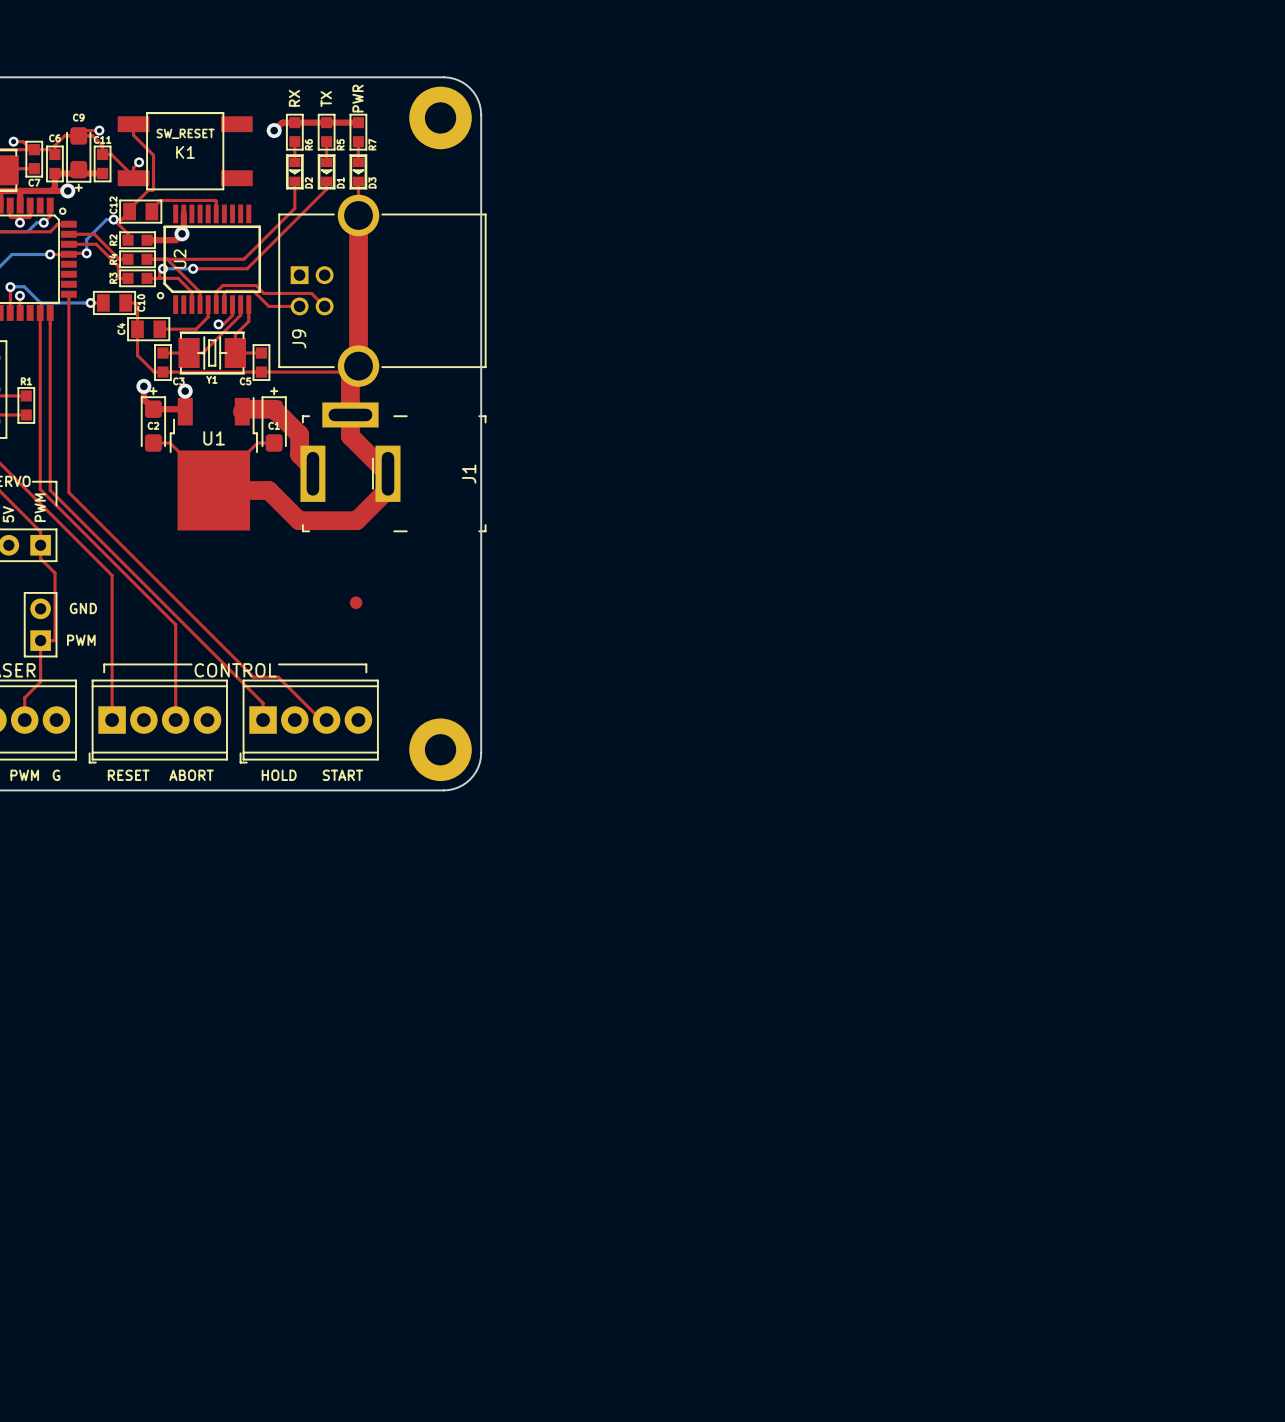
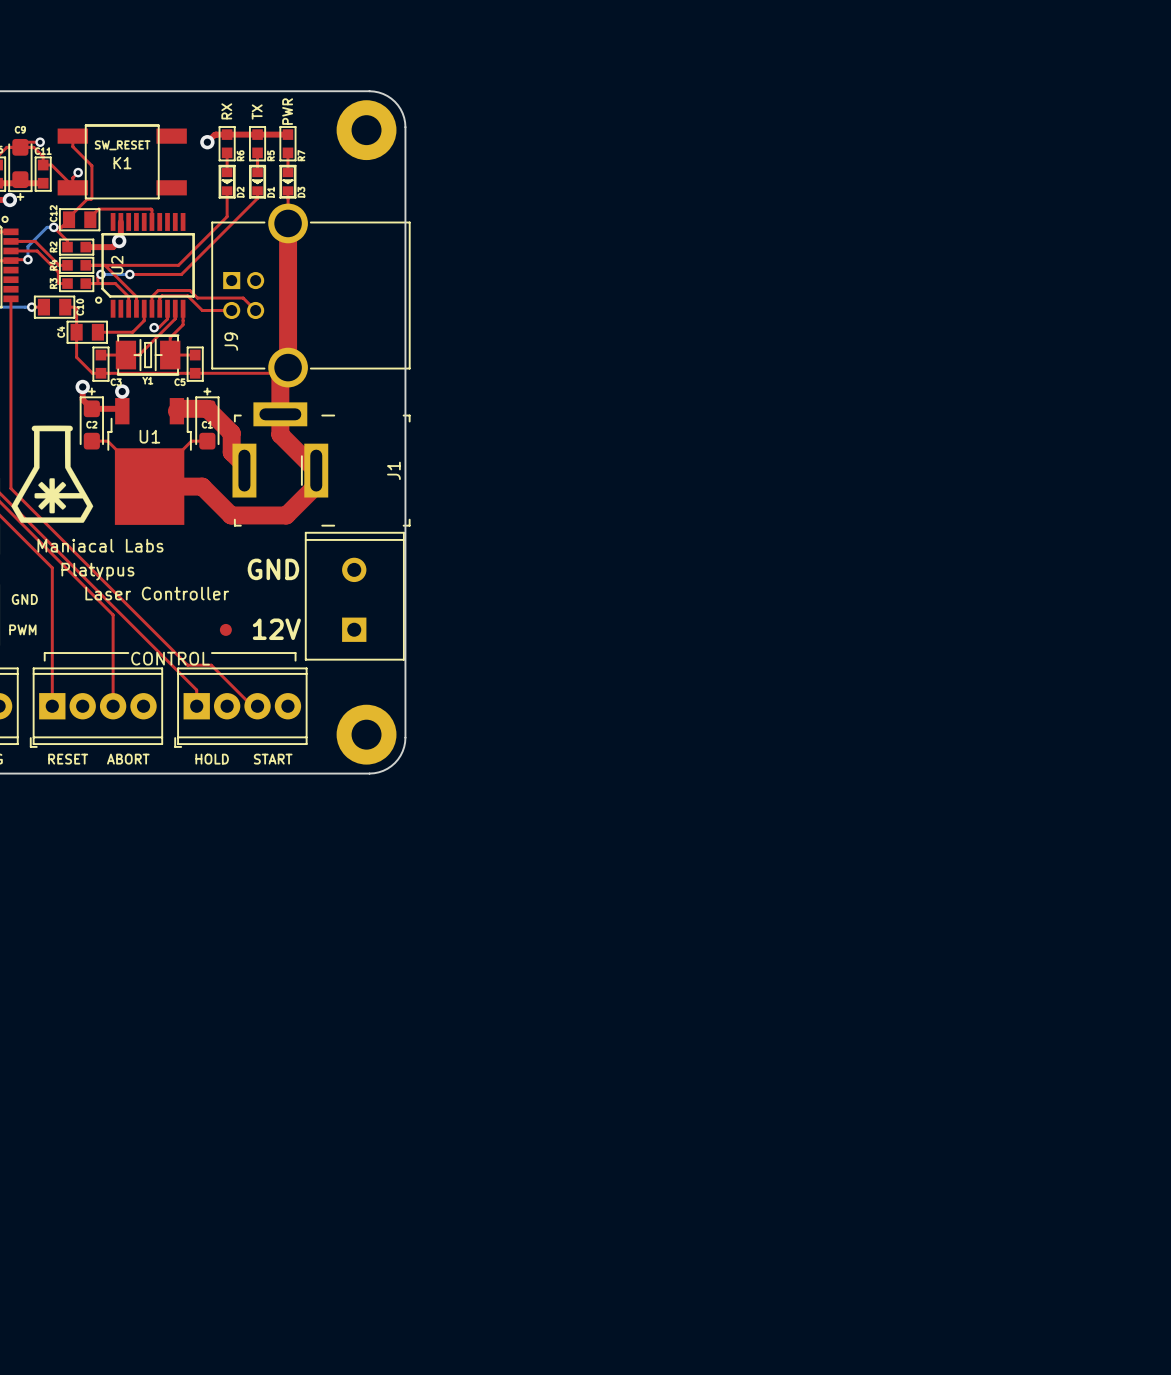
drawing: none -> [11, 425, 94, 523]
text: none -> Maniacal Labs (100, 545)
text: none -> GND (273, 569)
text: none -> Platypus (97, 571)
text: none -> Laser Controller (157, 593)
part position: (356, 602) -> (225, 629)
part: none -> (354, 596)
text: none -> 12V (276, 629)

